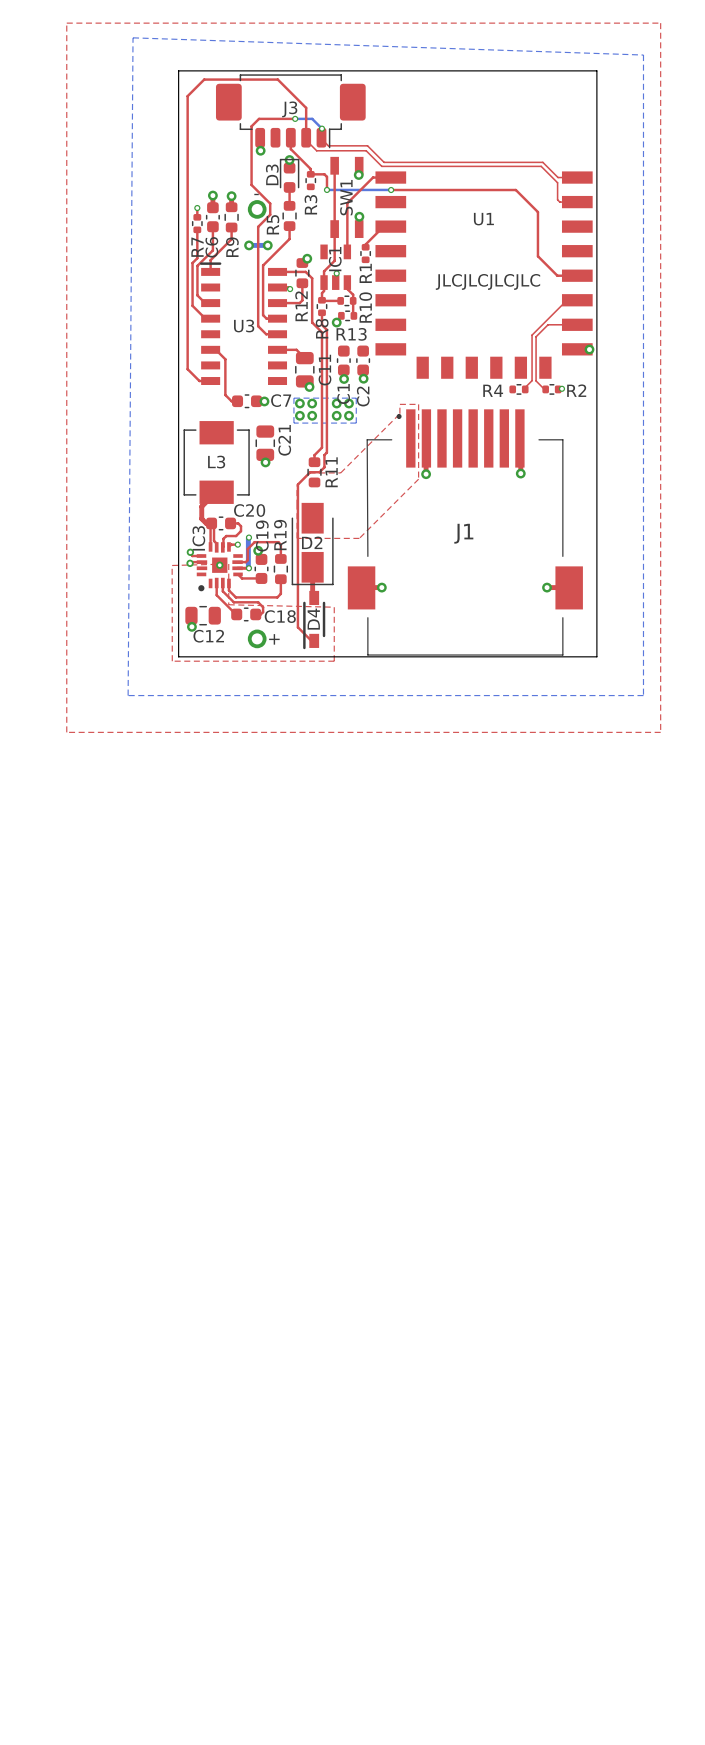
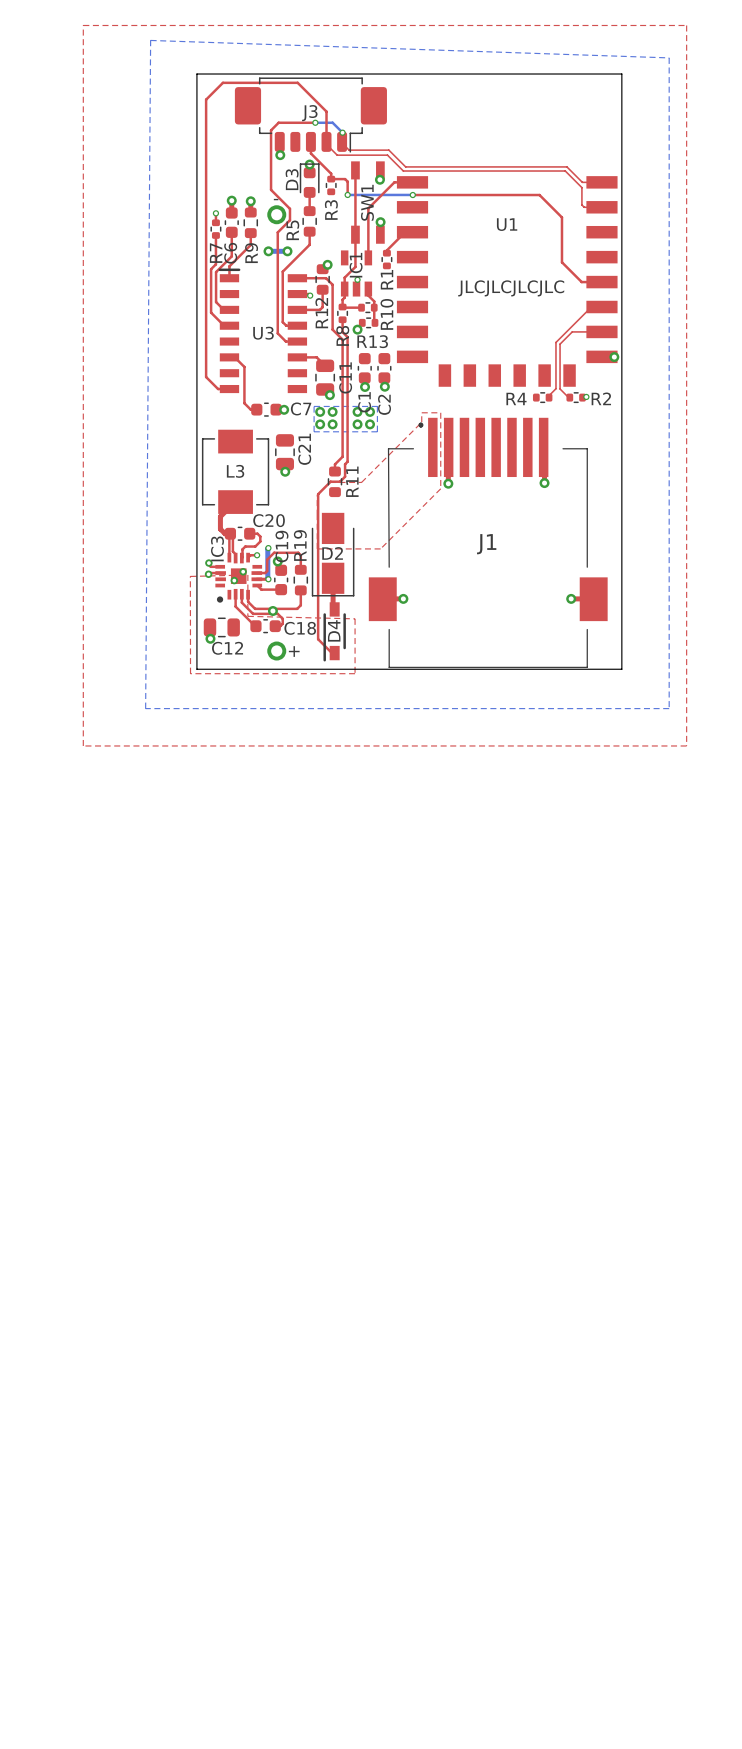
via: none -> (243, 571)
via: (219, 565) -> none
via: none -> (234, 580)
via: none -> (272, 610)

